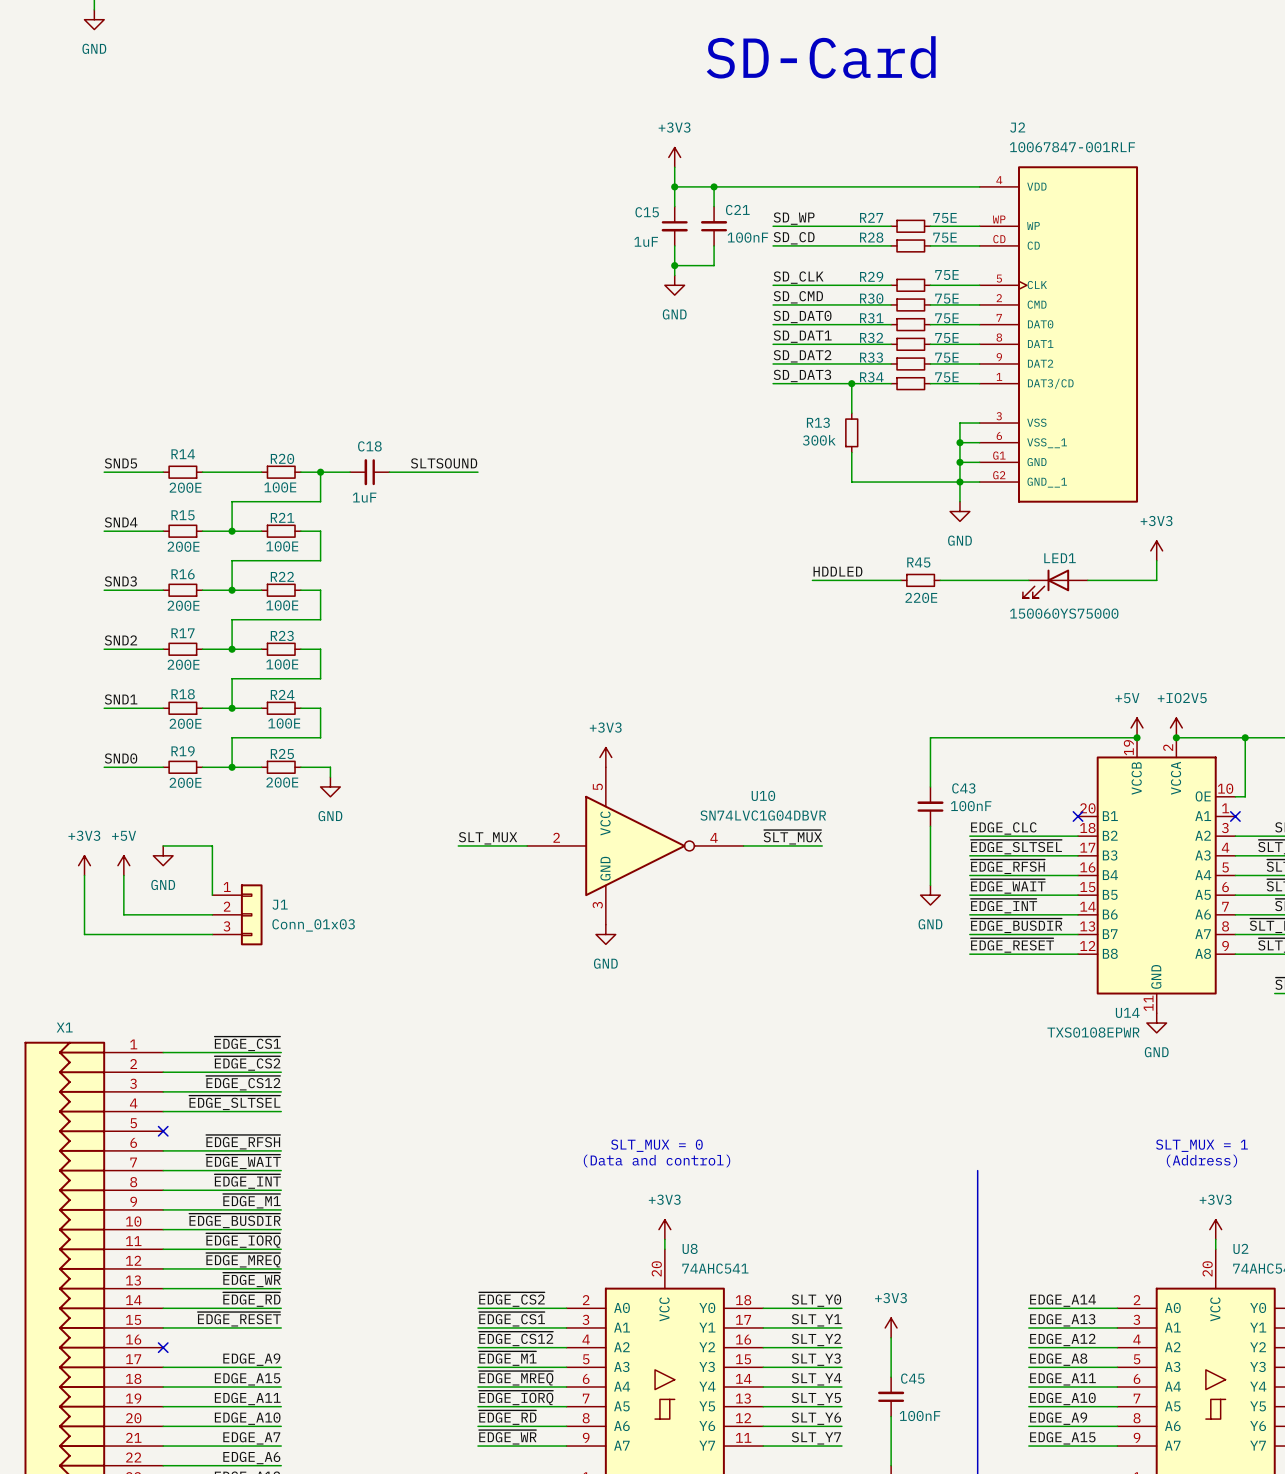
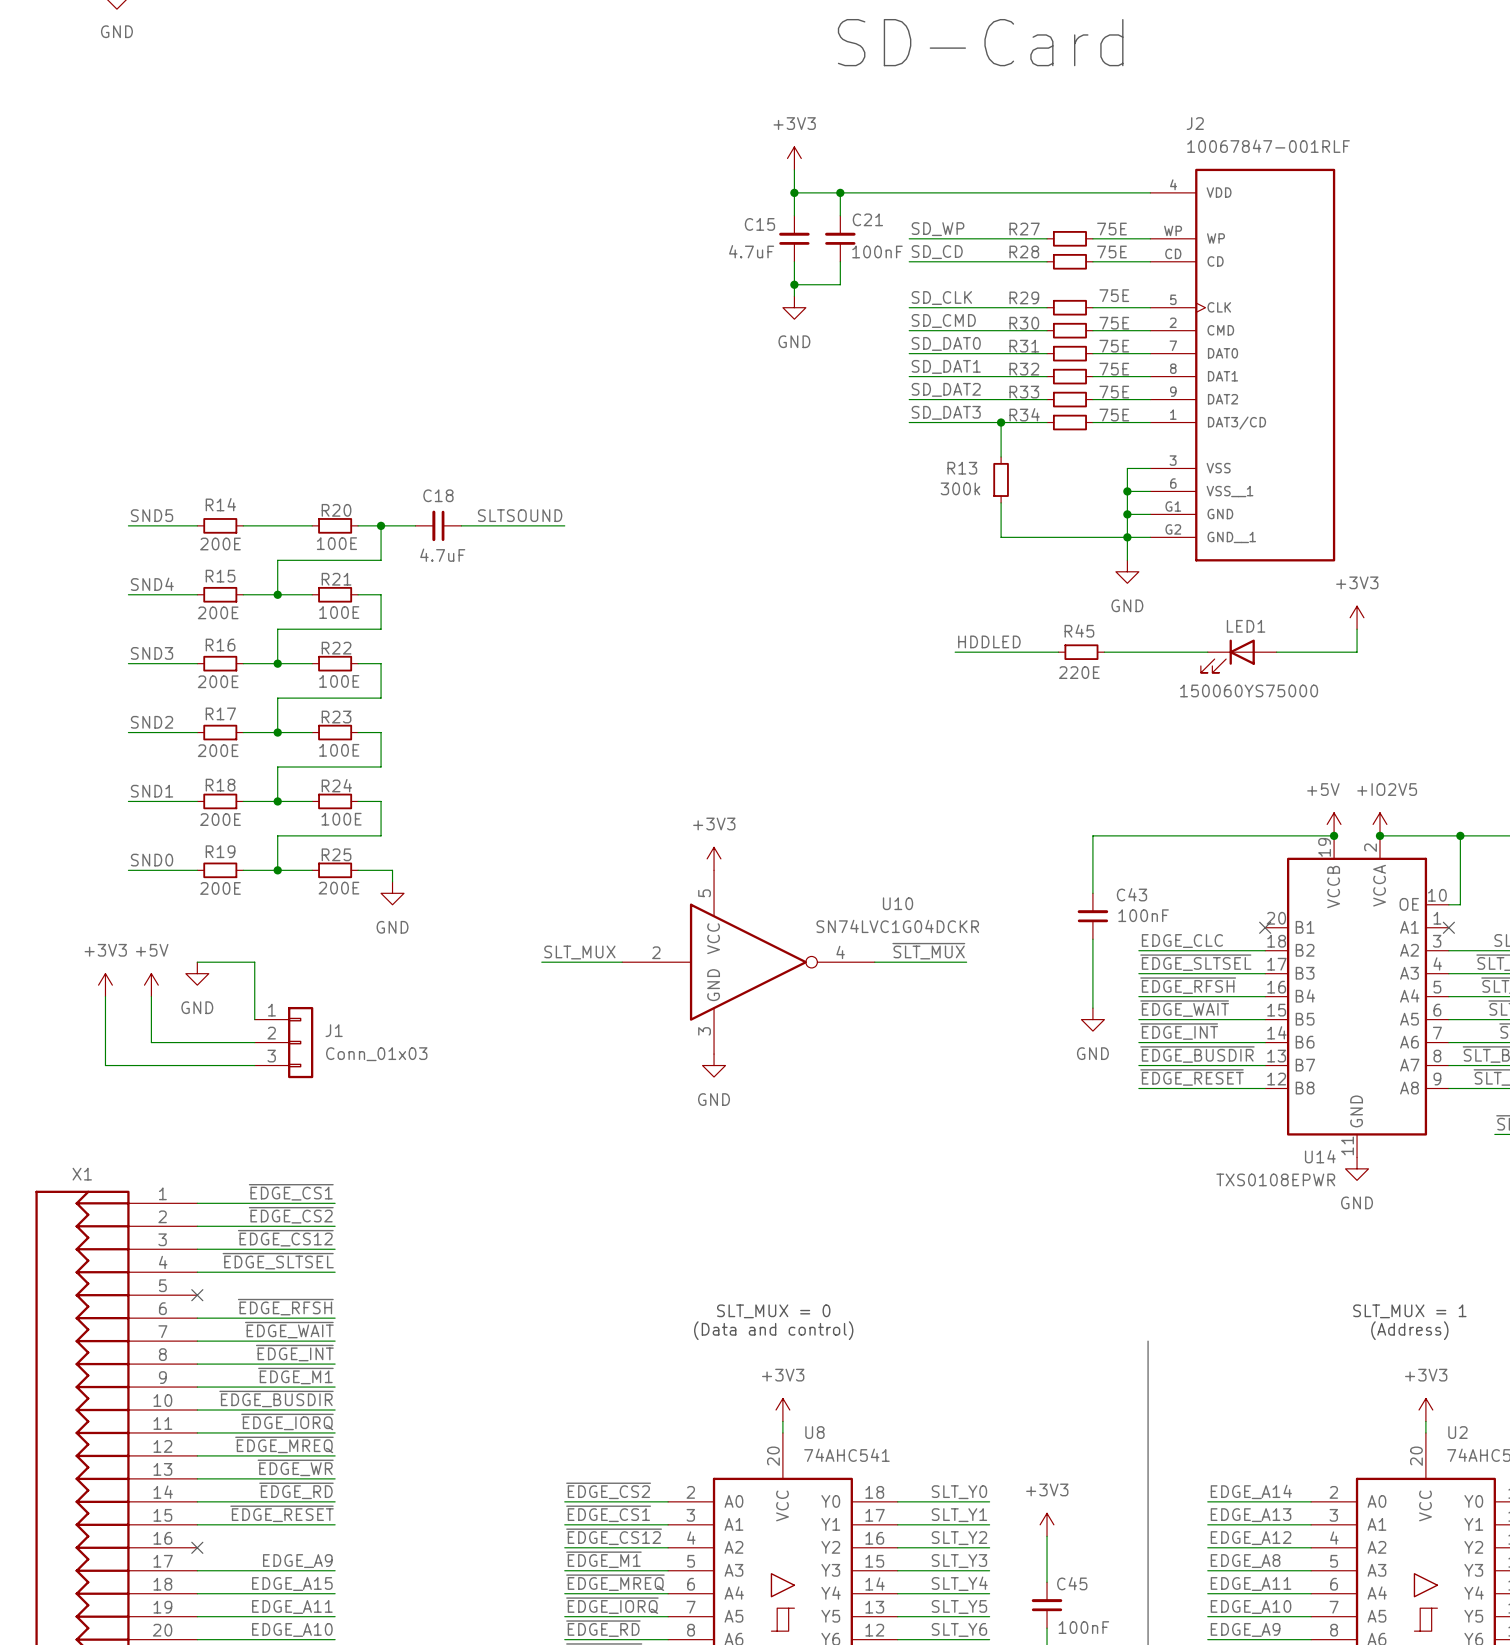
C15 rotation: 0° (674, 226) -> 180° (794, 238)
C15 value: 1uF (646, 241) -> 4.7uF (751, 251)
C18 value: 1uF (364, 497) -> 4.7uF (442, 555)
U10 value: SN74LVC1G04DBVR (763, 815) -> SN74LVC1G04DCKR (897, 926)

